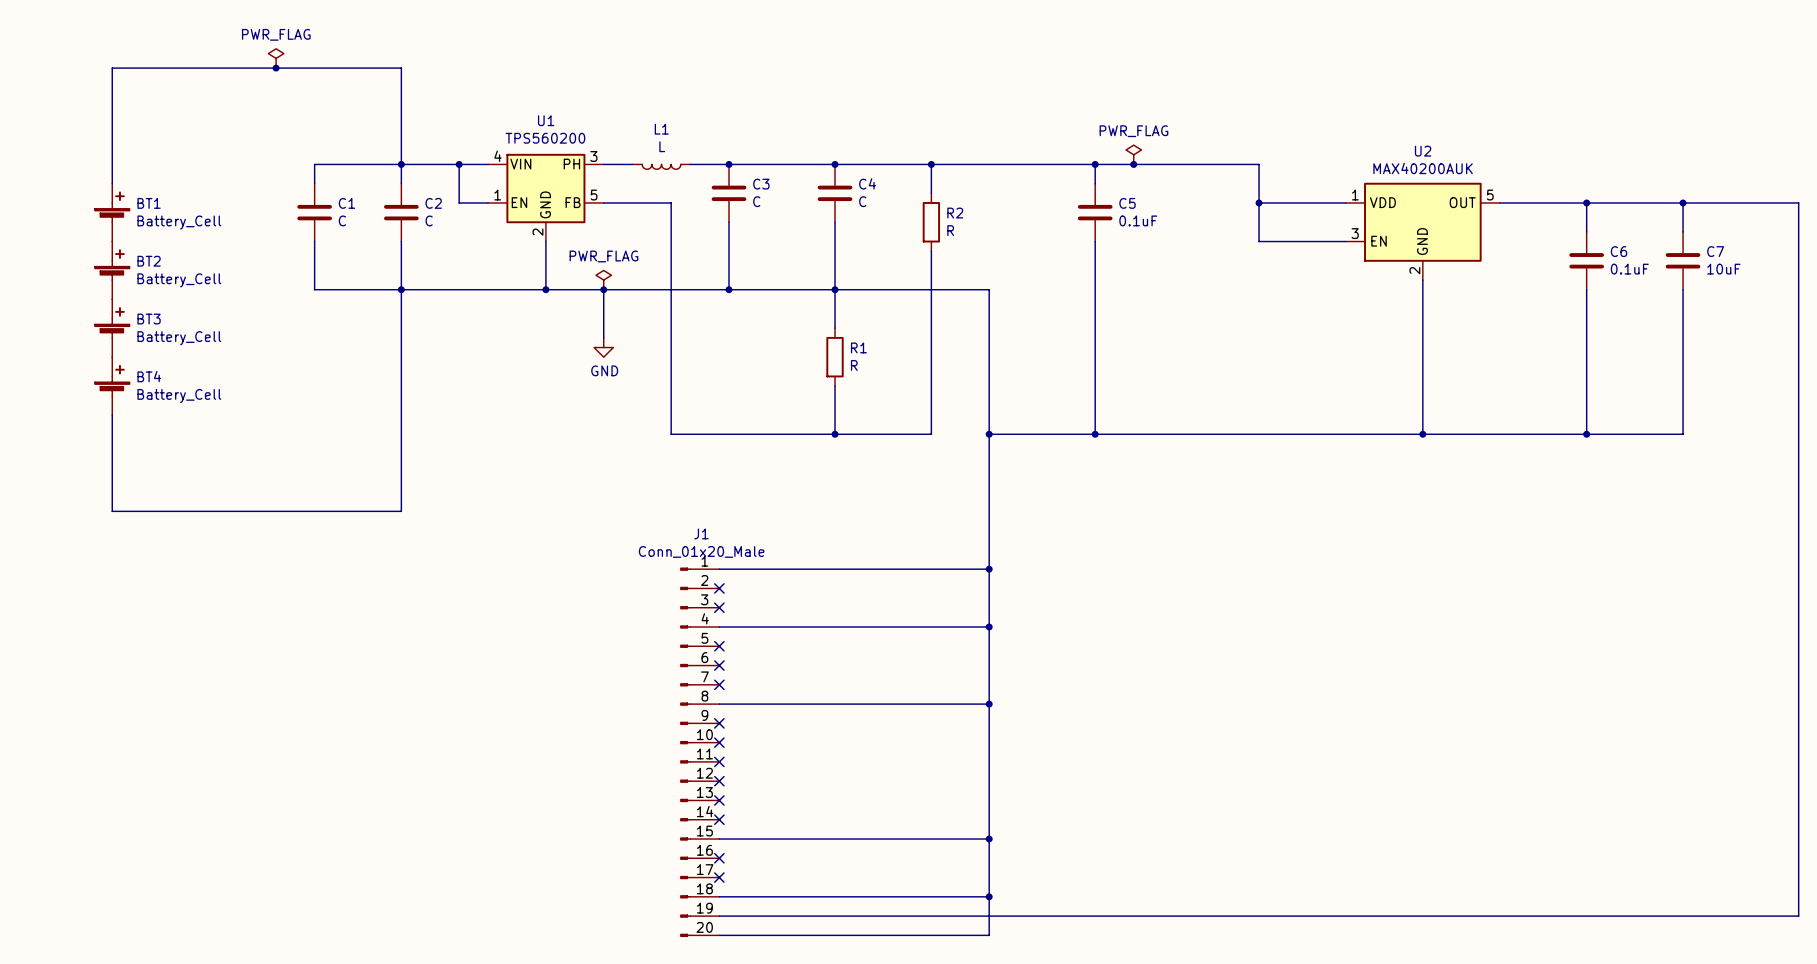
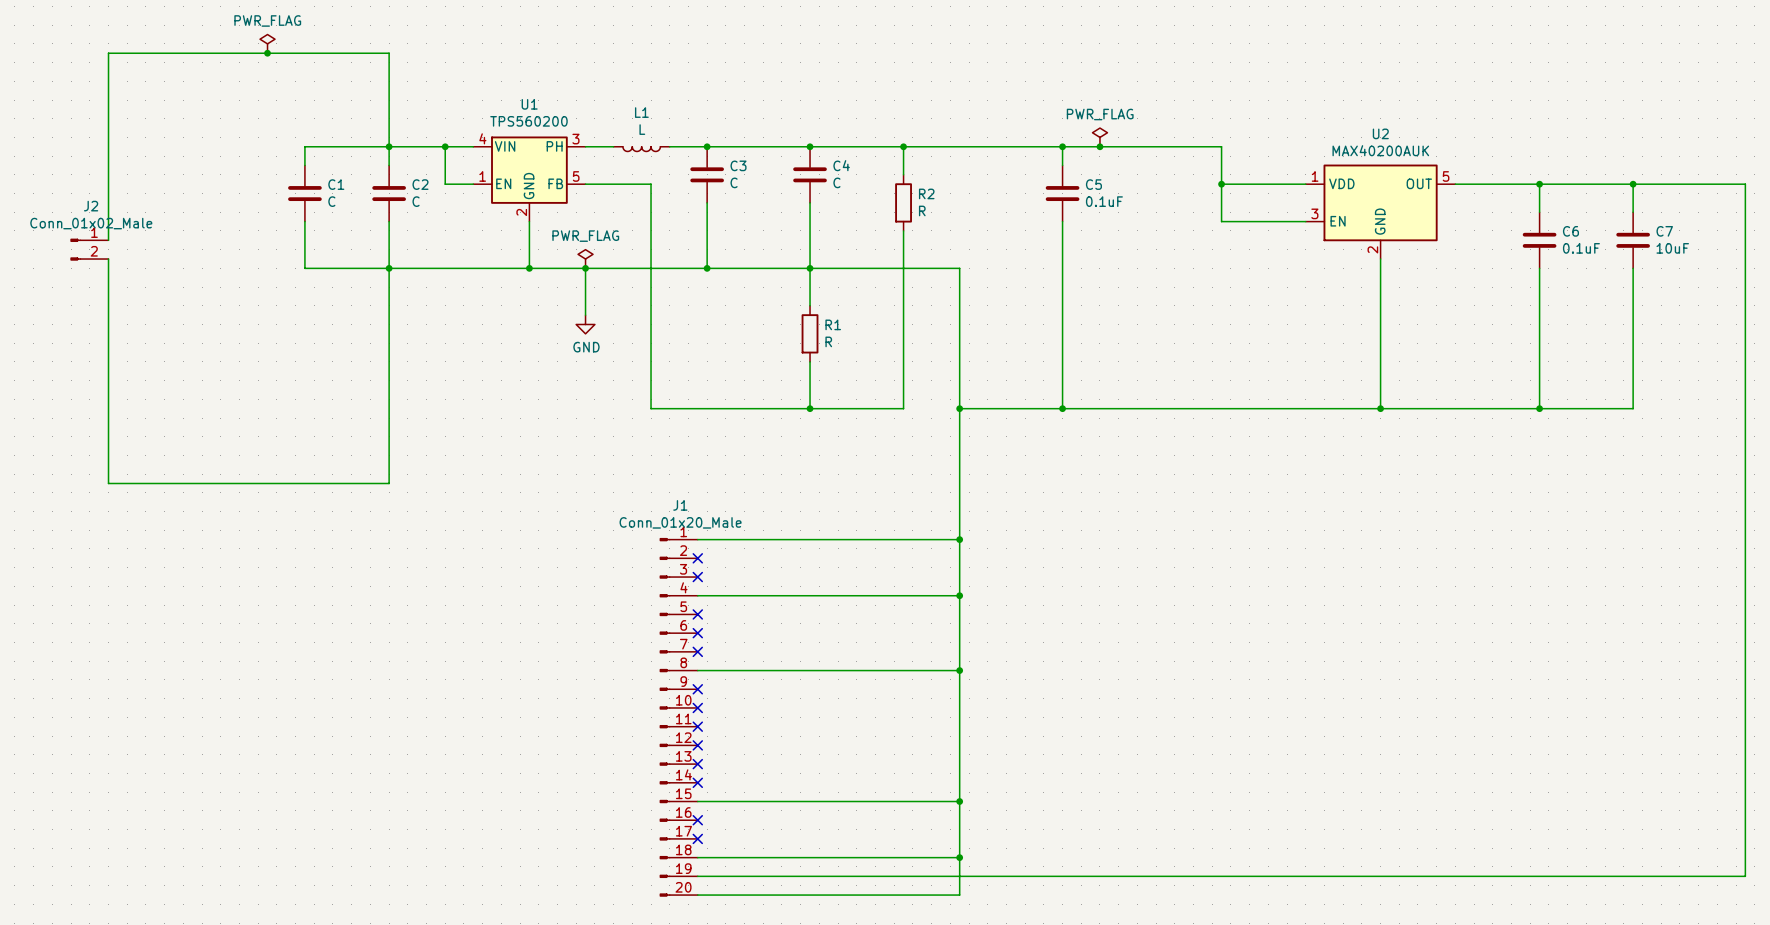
BT1: Battery_Cell (112, 212) -> none
J2: none -> Conn_01x02_Male (89, 249)
BT2: Battery_Cell (112, 270) -> none
BT3: Battery_Cell (112, 328) -> none
BT4: Battery_Cell (112, 386) -> none

